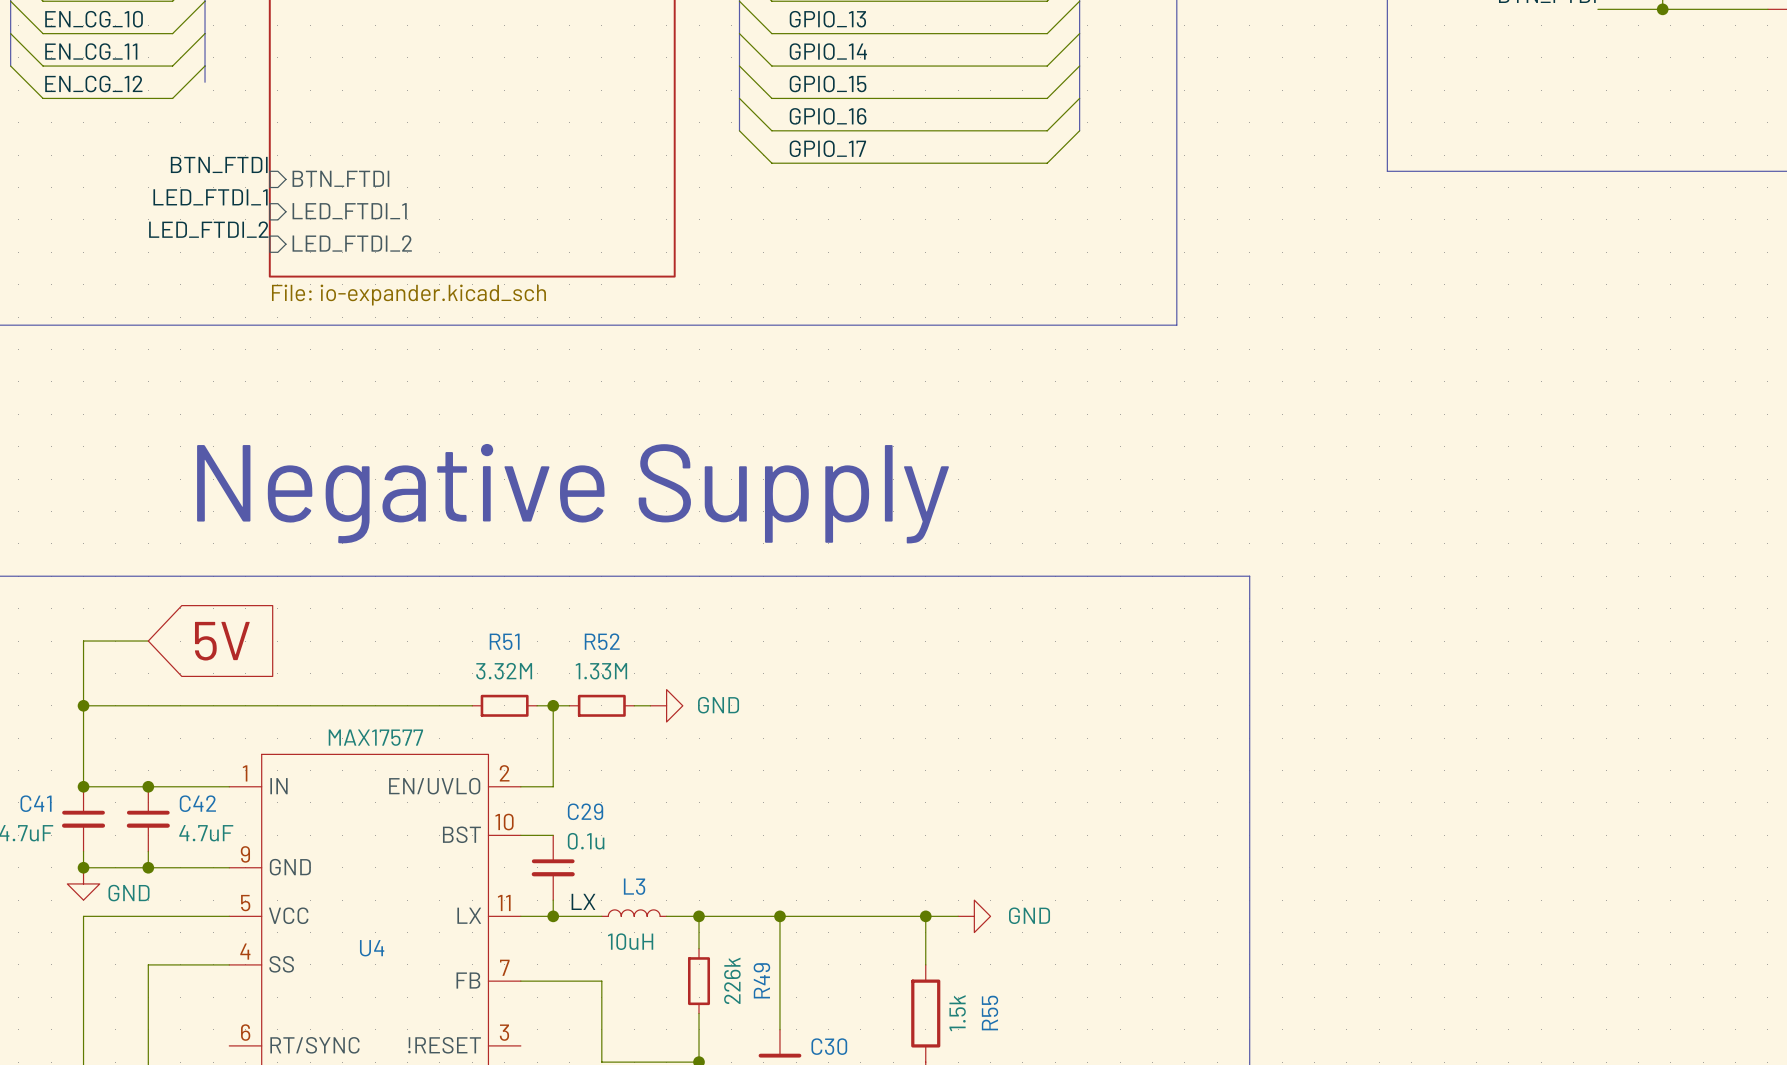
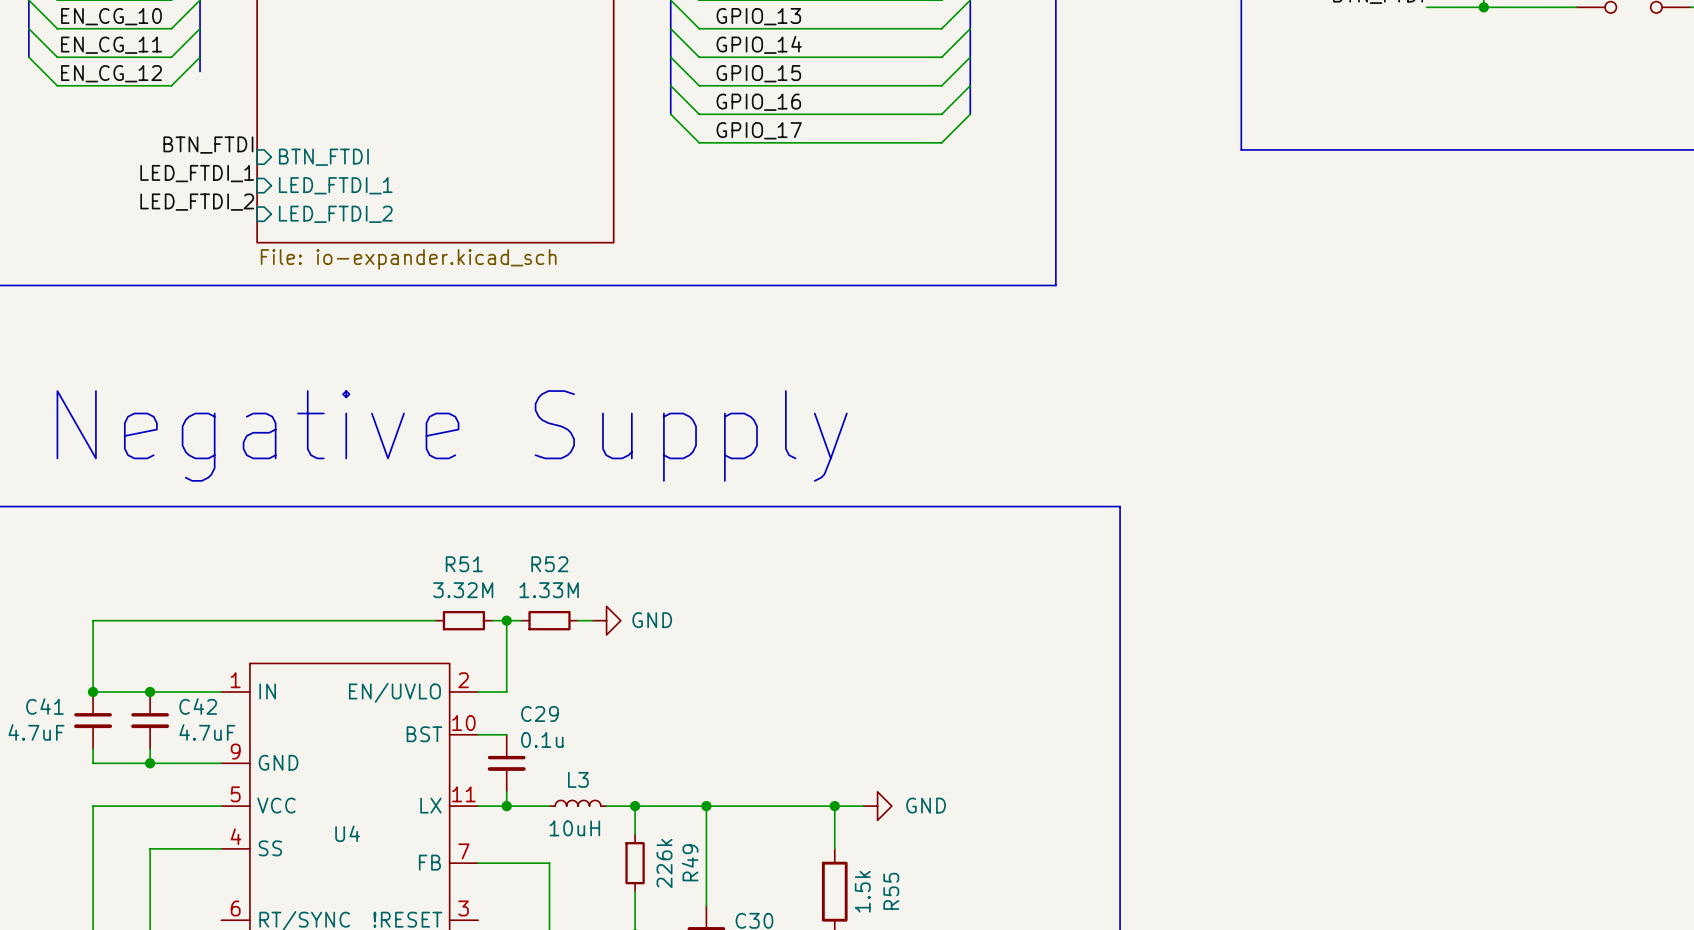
wire: (148, 641) (83, 641) (83, 705) -> none
global label: 5V (222, 641) -> none
junction: (83, 705) -> none
U4 value: MAX17577 (375, 737) -> none
junction: (83, 867) -> none
power symbol: GND (83, 883) -> none
label: LX (583, 901) -> none

